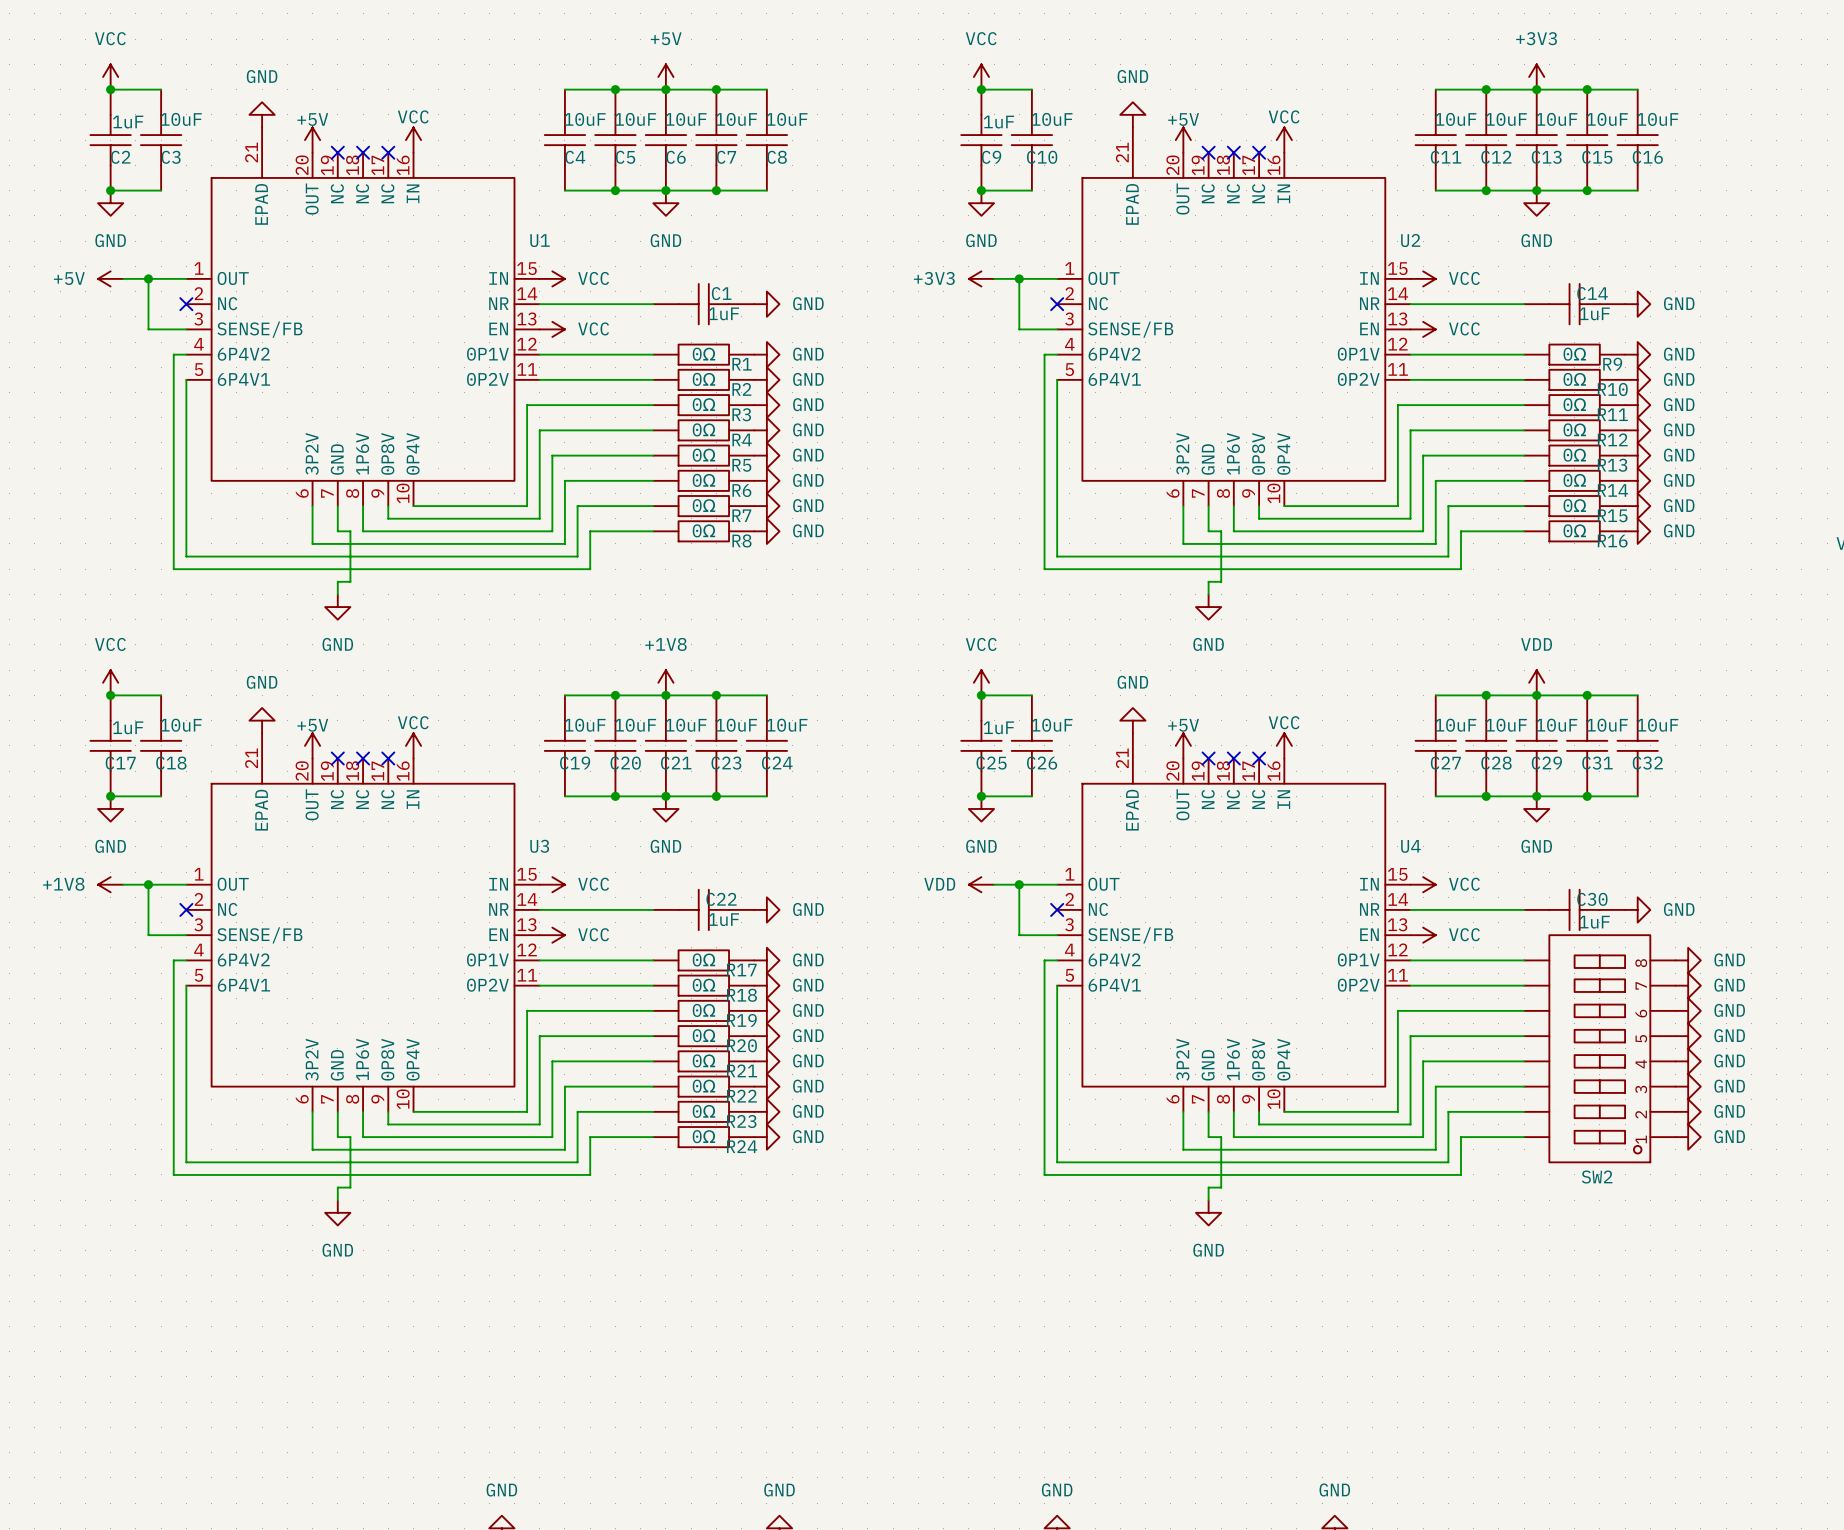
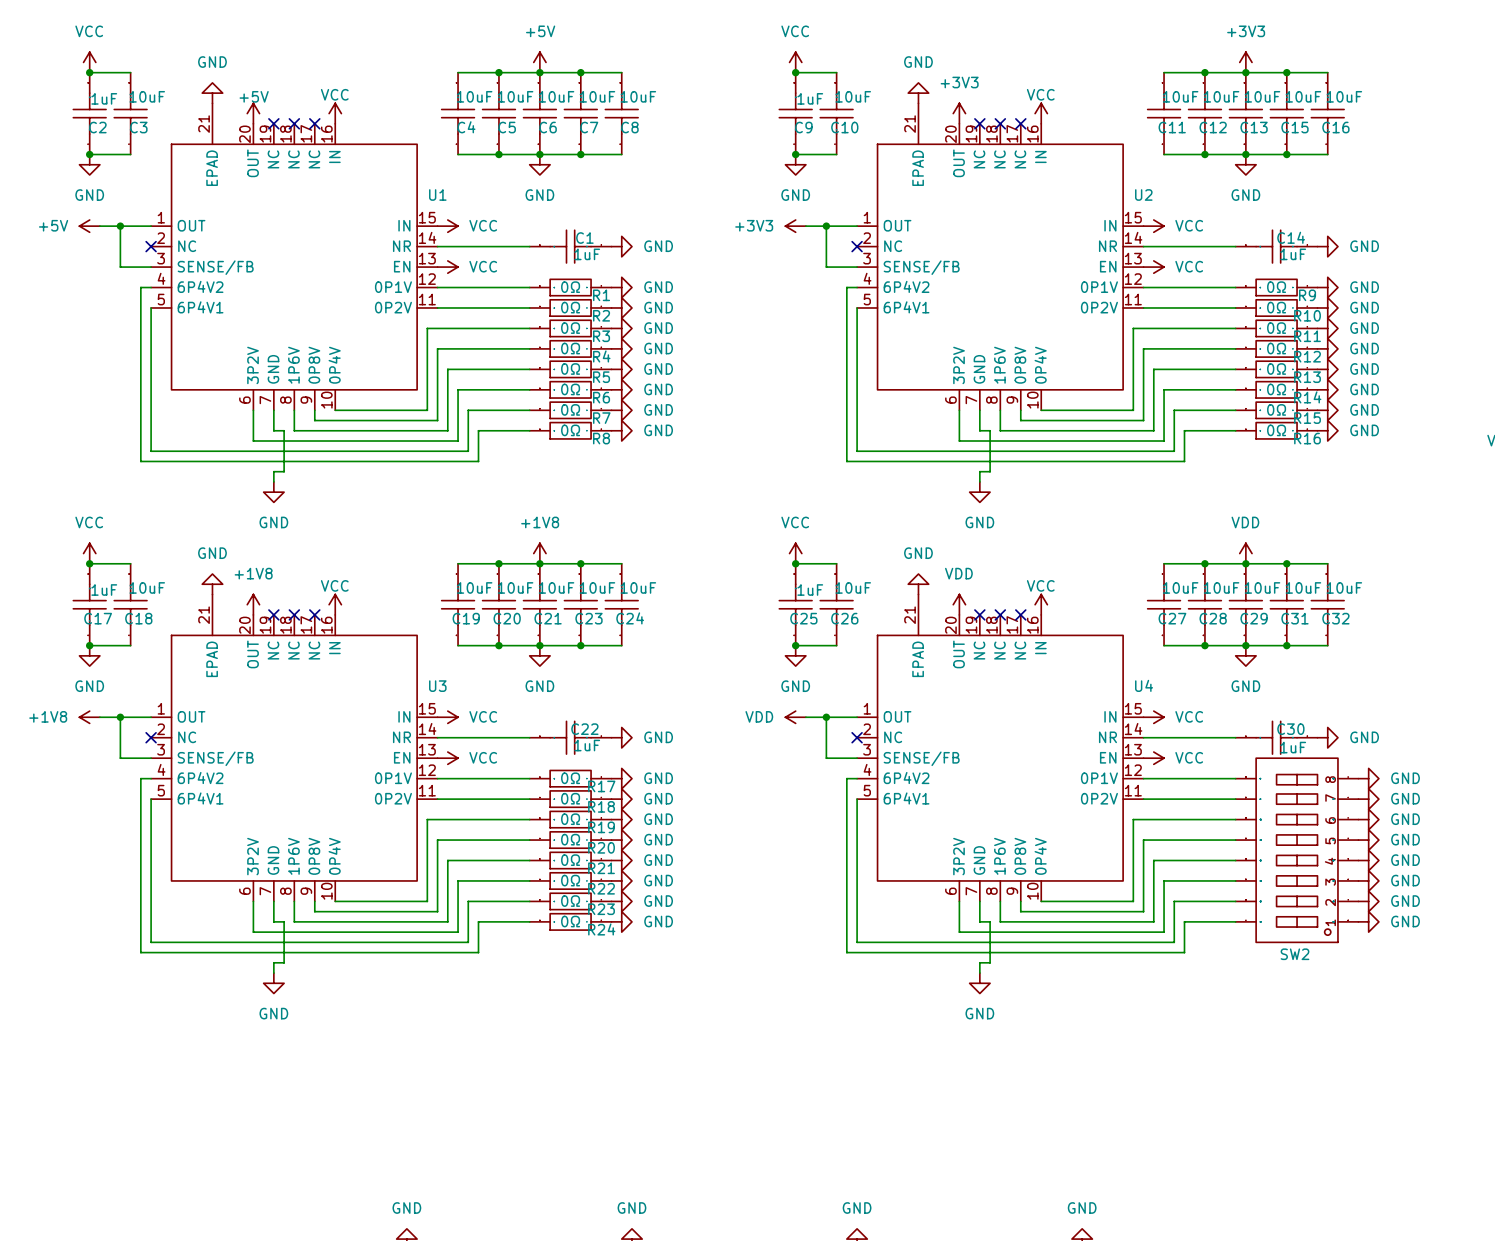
power symbol: +5V (1183, 140) -> +3V3 (959, 113)
power symbol: +5V (312, 745) -> +1V8 (253, 604)
power symbol: +5V (1183, 745) -> VDD (959, 604)

